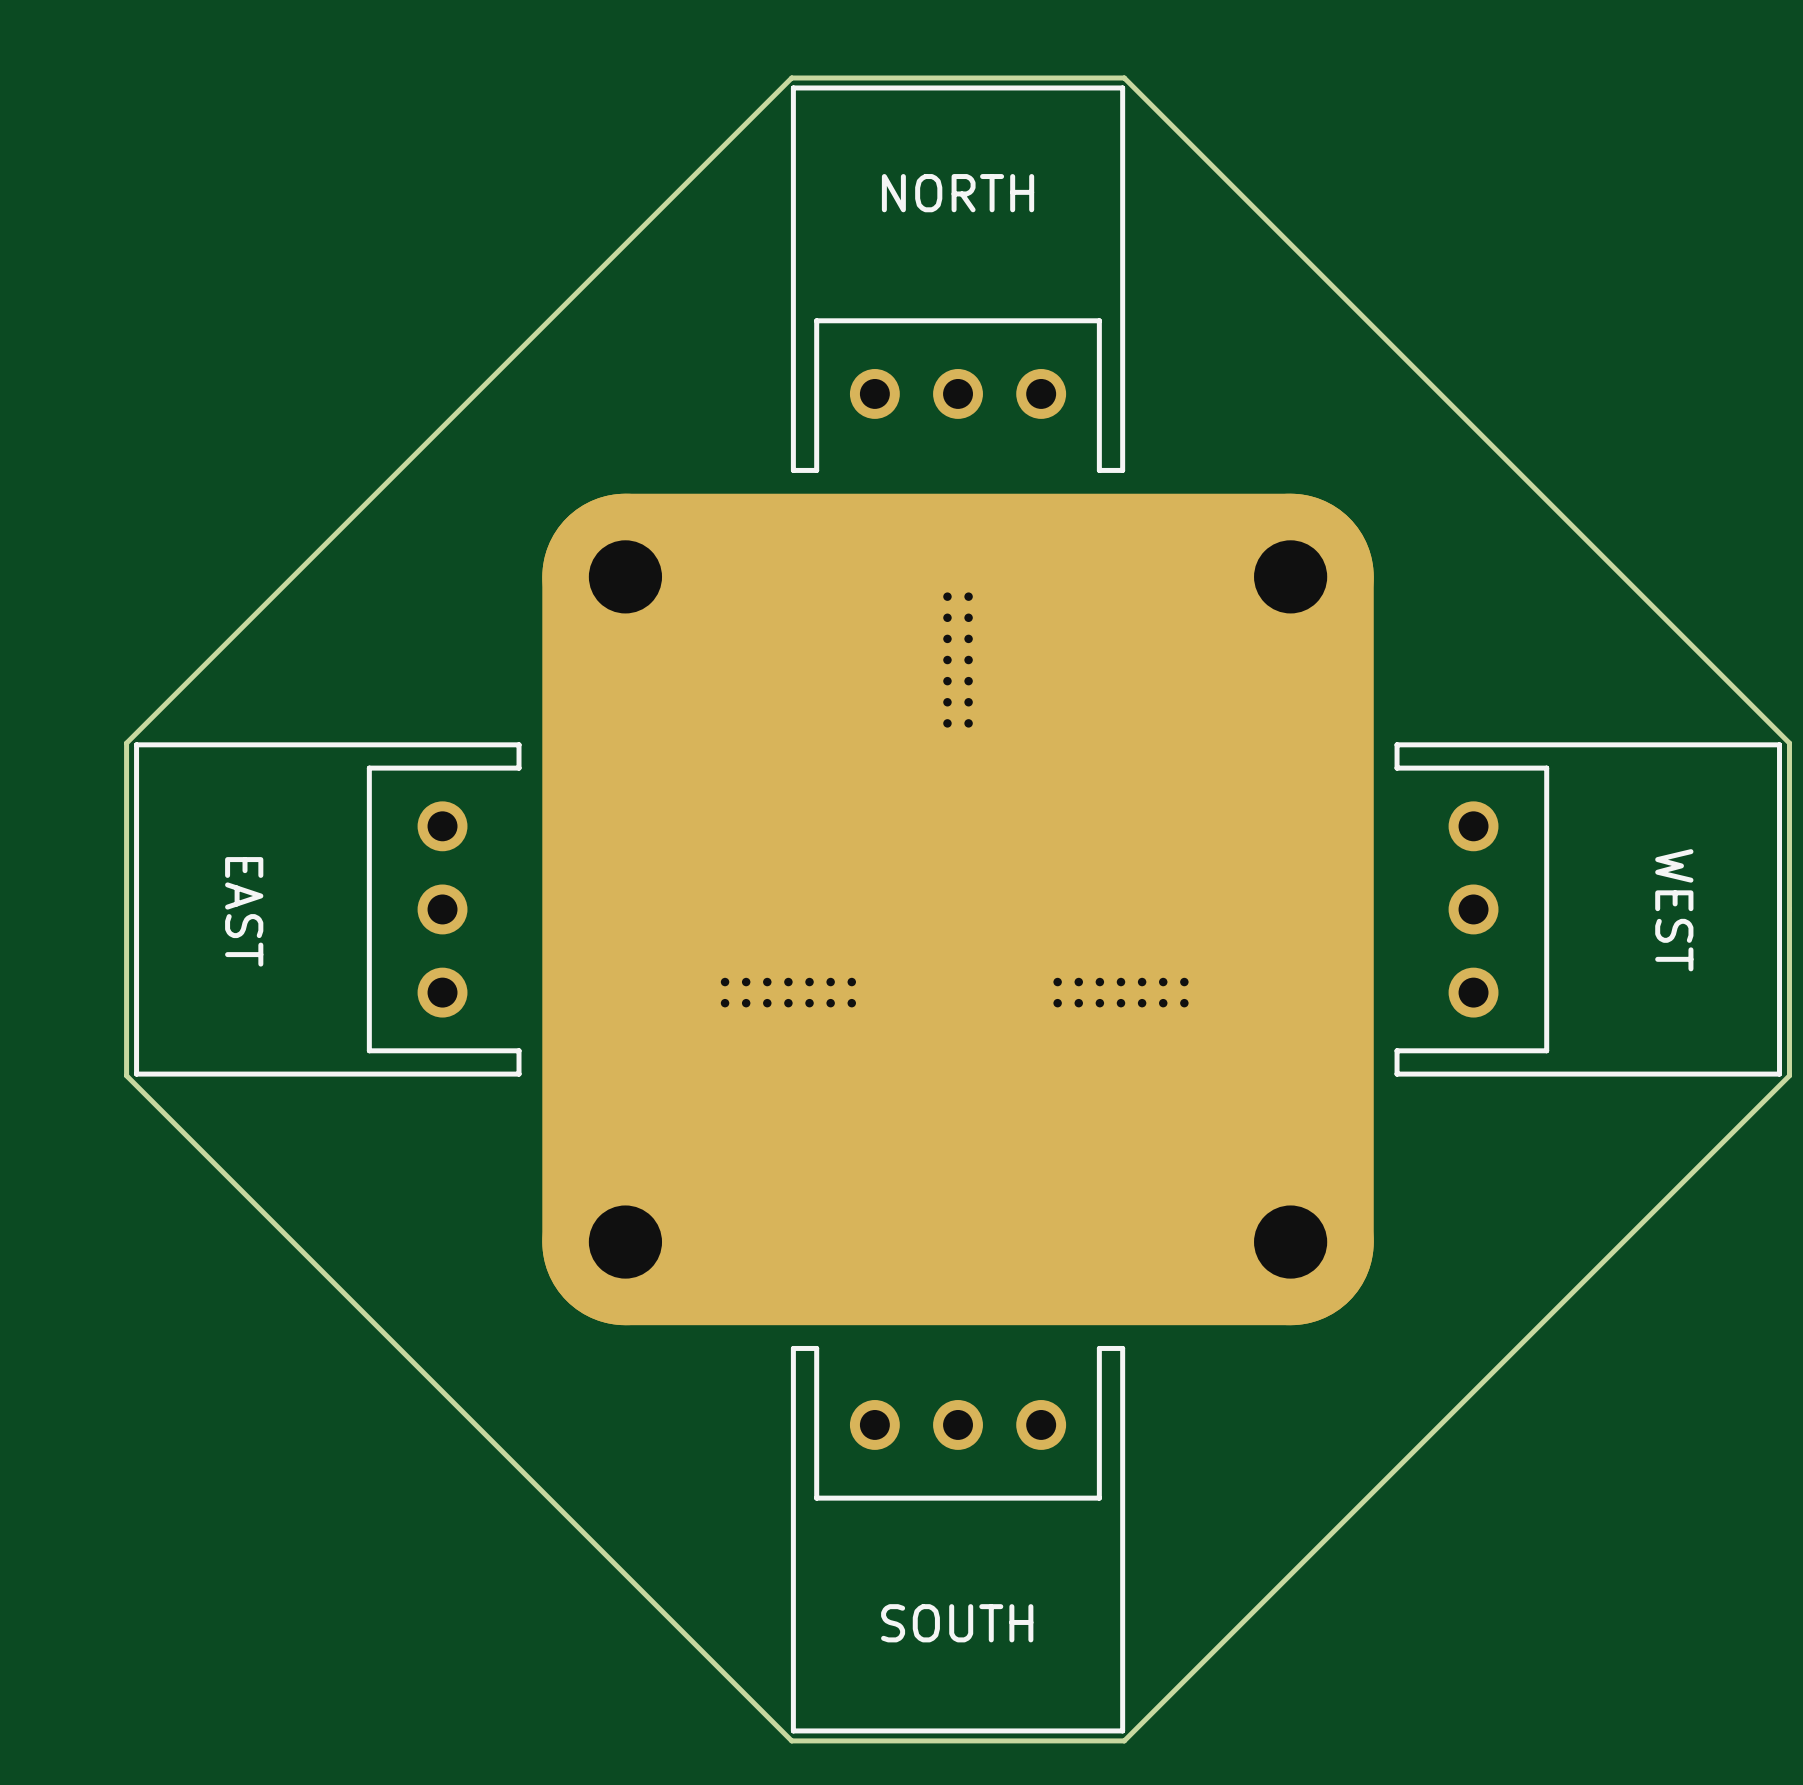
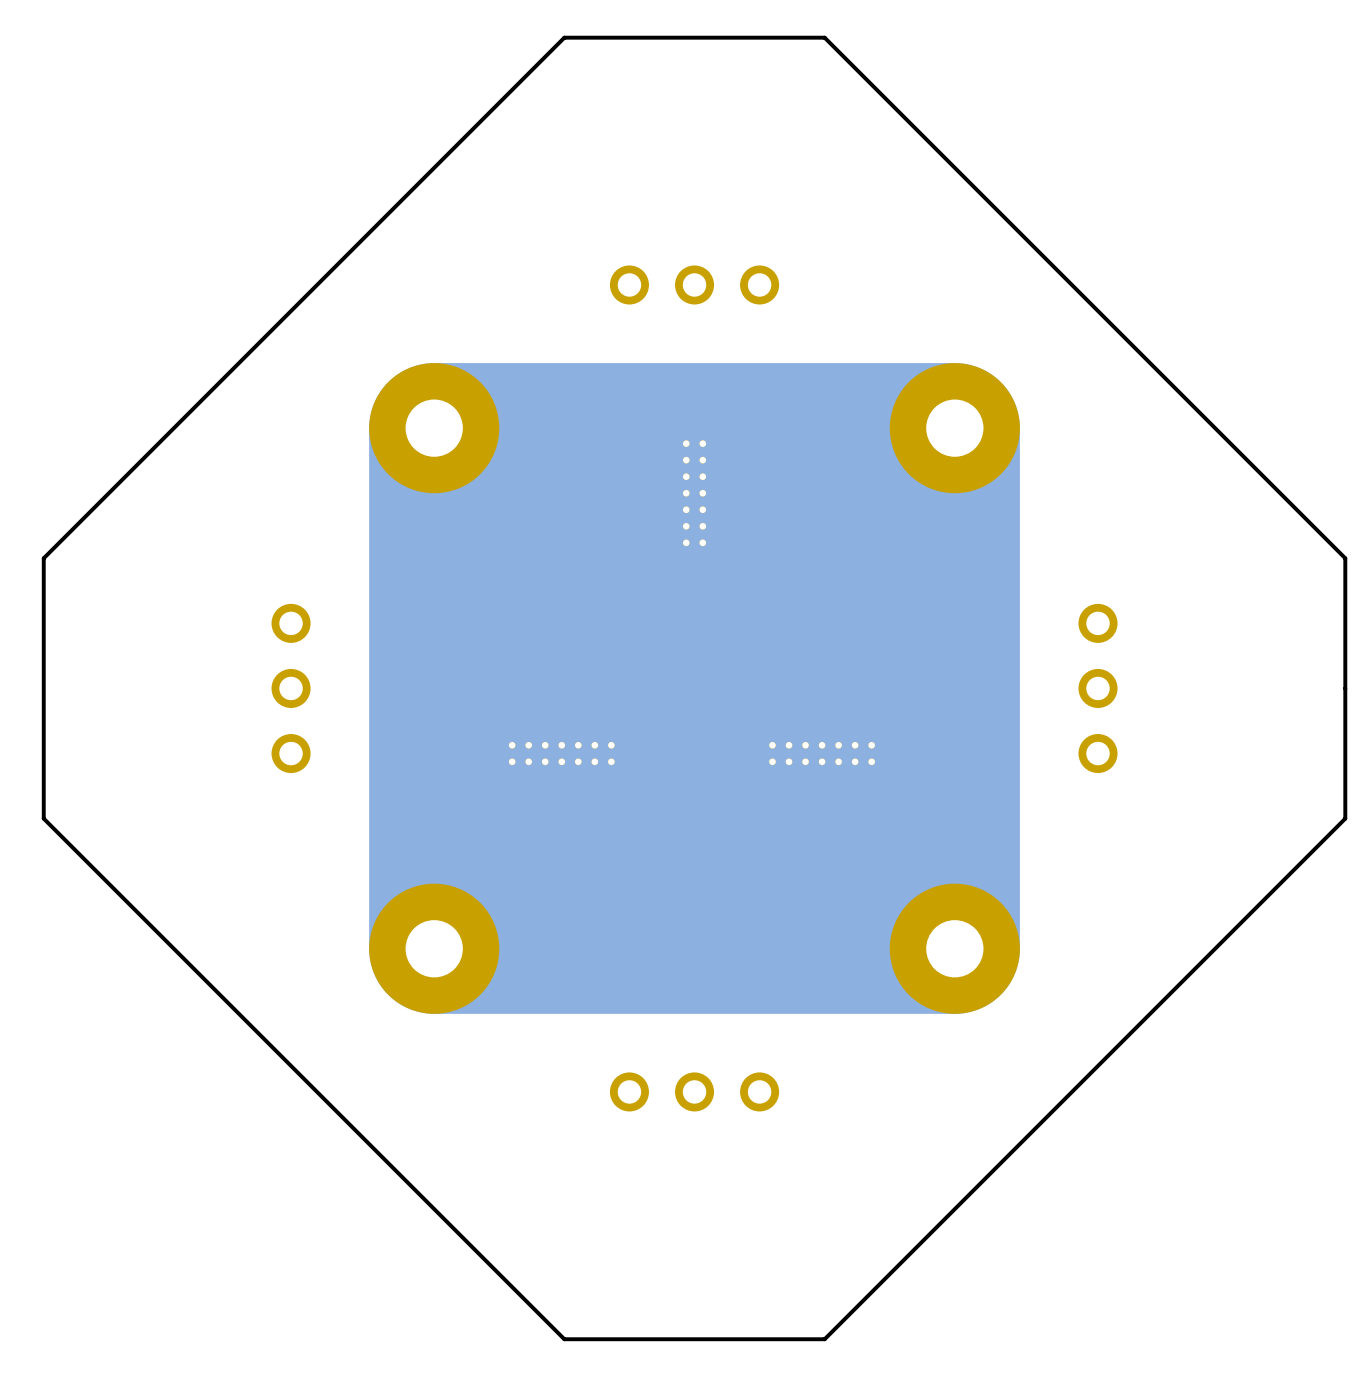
part side: bottom (958, 279) -> top (694, 284)
part side: bottom (327, 909) -> top (291, 688)
part side: bottom (1588, 909) -> top (1098, 688)
part side: bottom (958, 1539) -> top (694, 1091)

